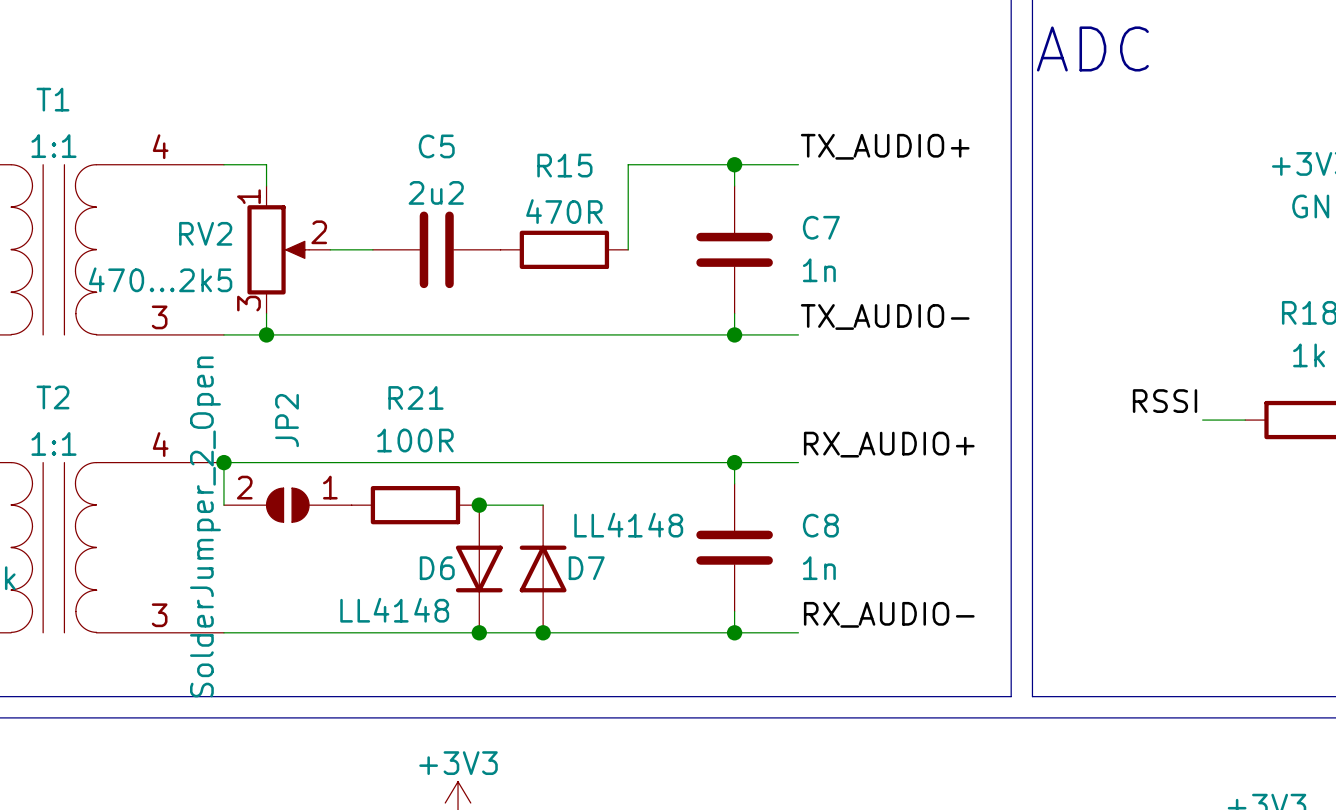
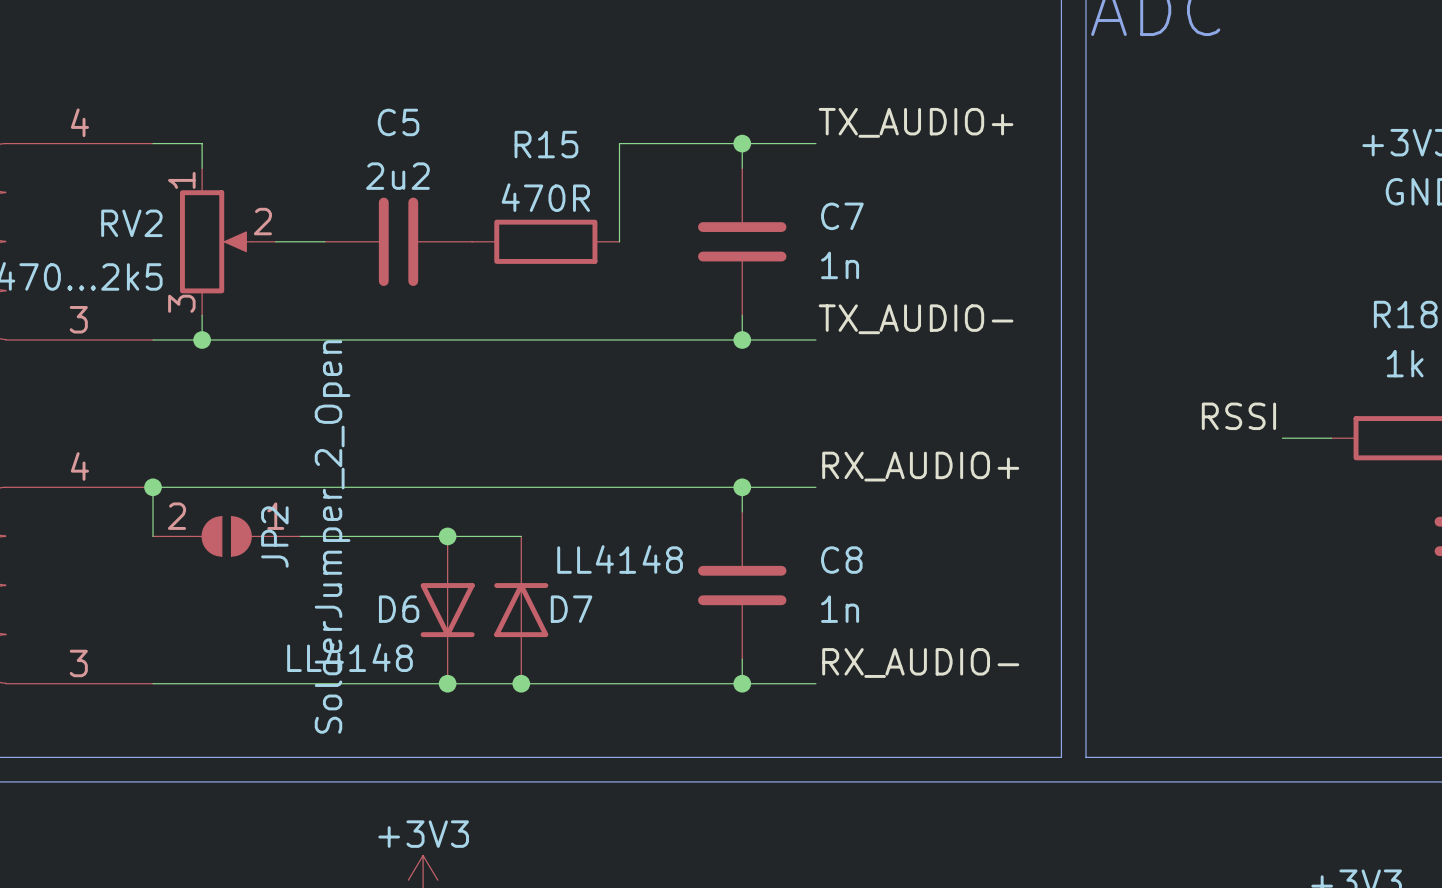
JP2 name position: JP2 (287, 420) -> JP2 (274, 537)
wire: none -> (300, 536) (447, 536)
R21: 100R (415, 505) -> none
JP2 value position: SolderJumper_2_Open (205, 526) -> SolderJumper_2_Open (332, 537)

